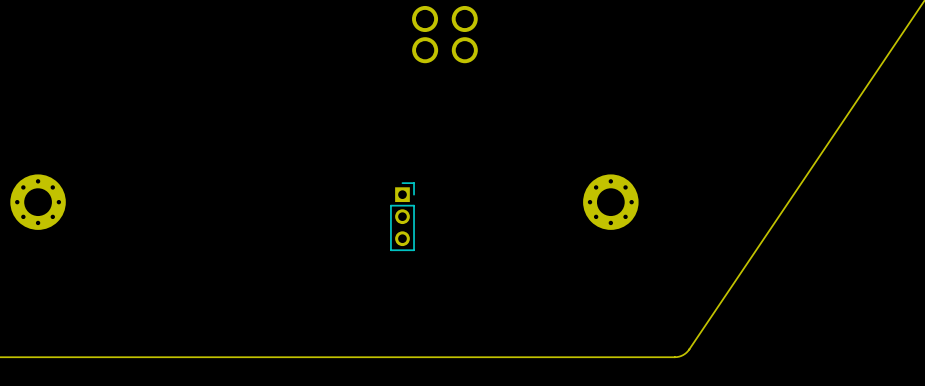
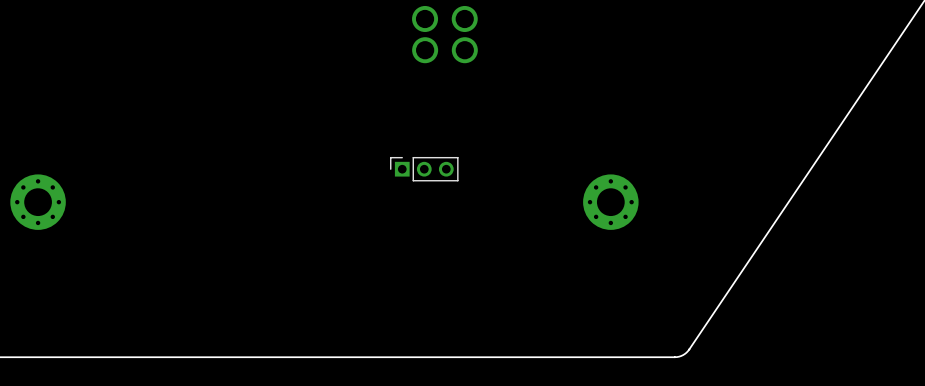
part rotation: 0° (402, 216) -> 90° counterclockwise (424, 169)
part position: (402, 216) -> (424, 169)

